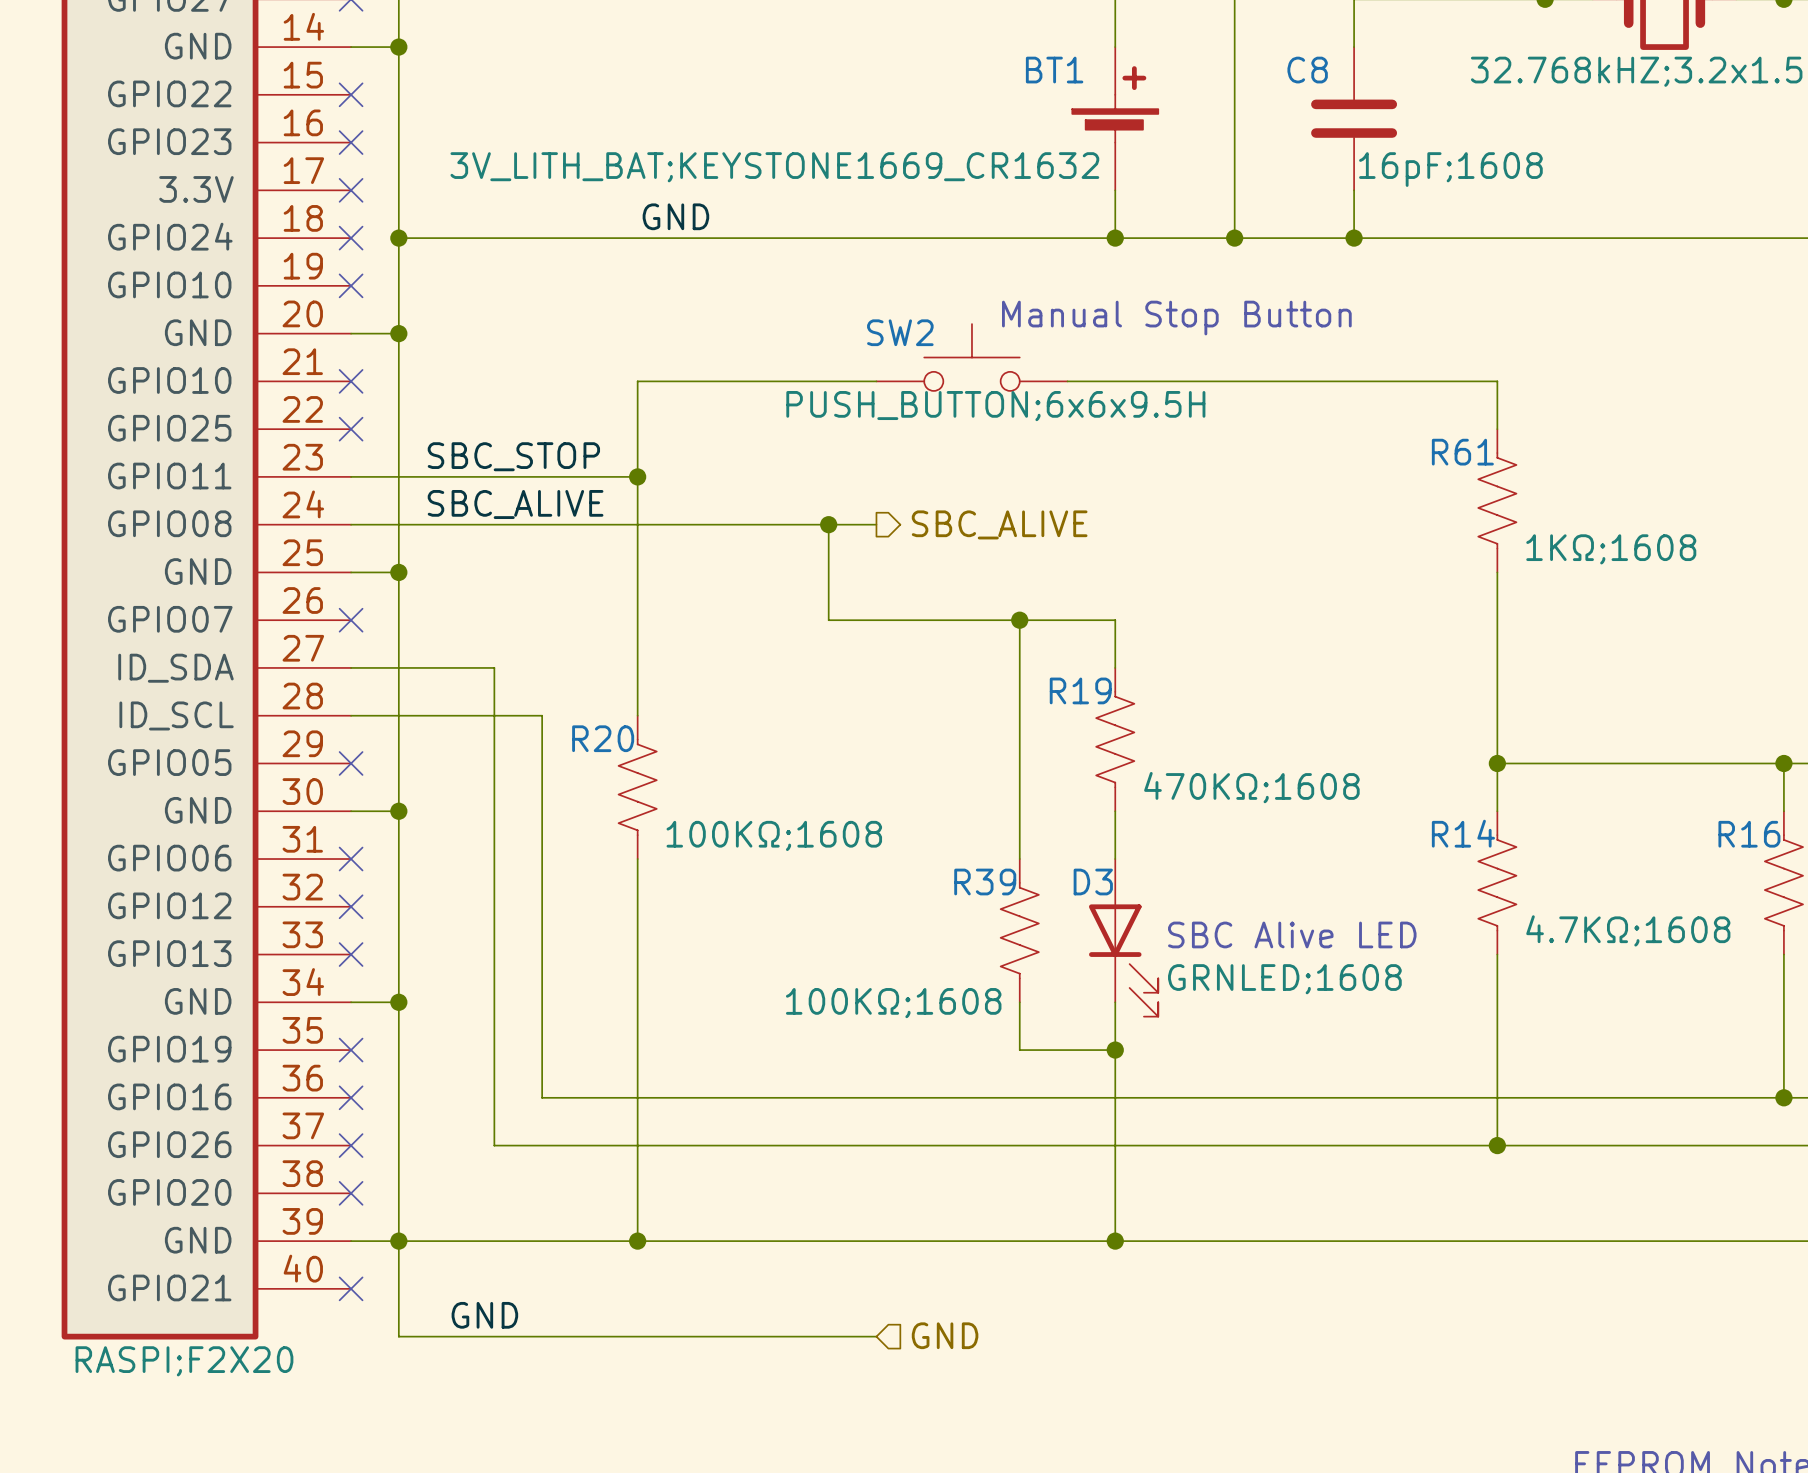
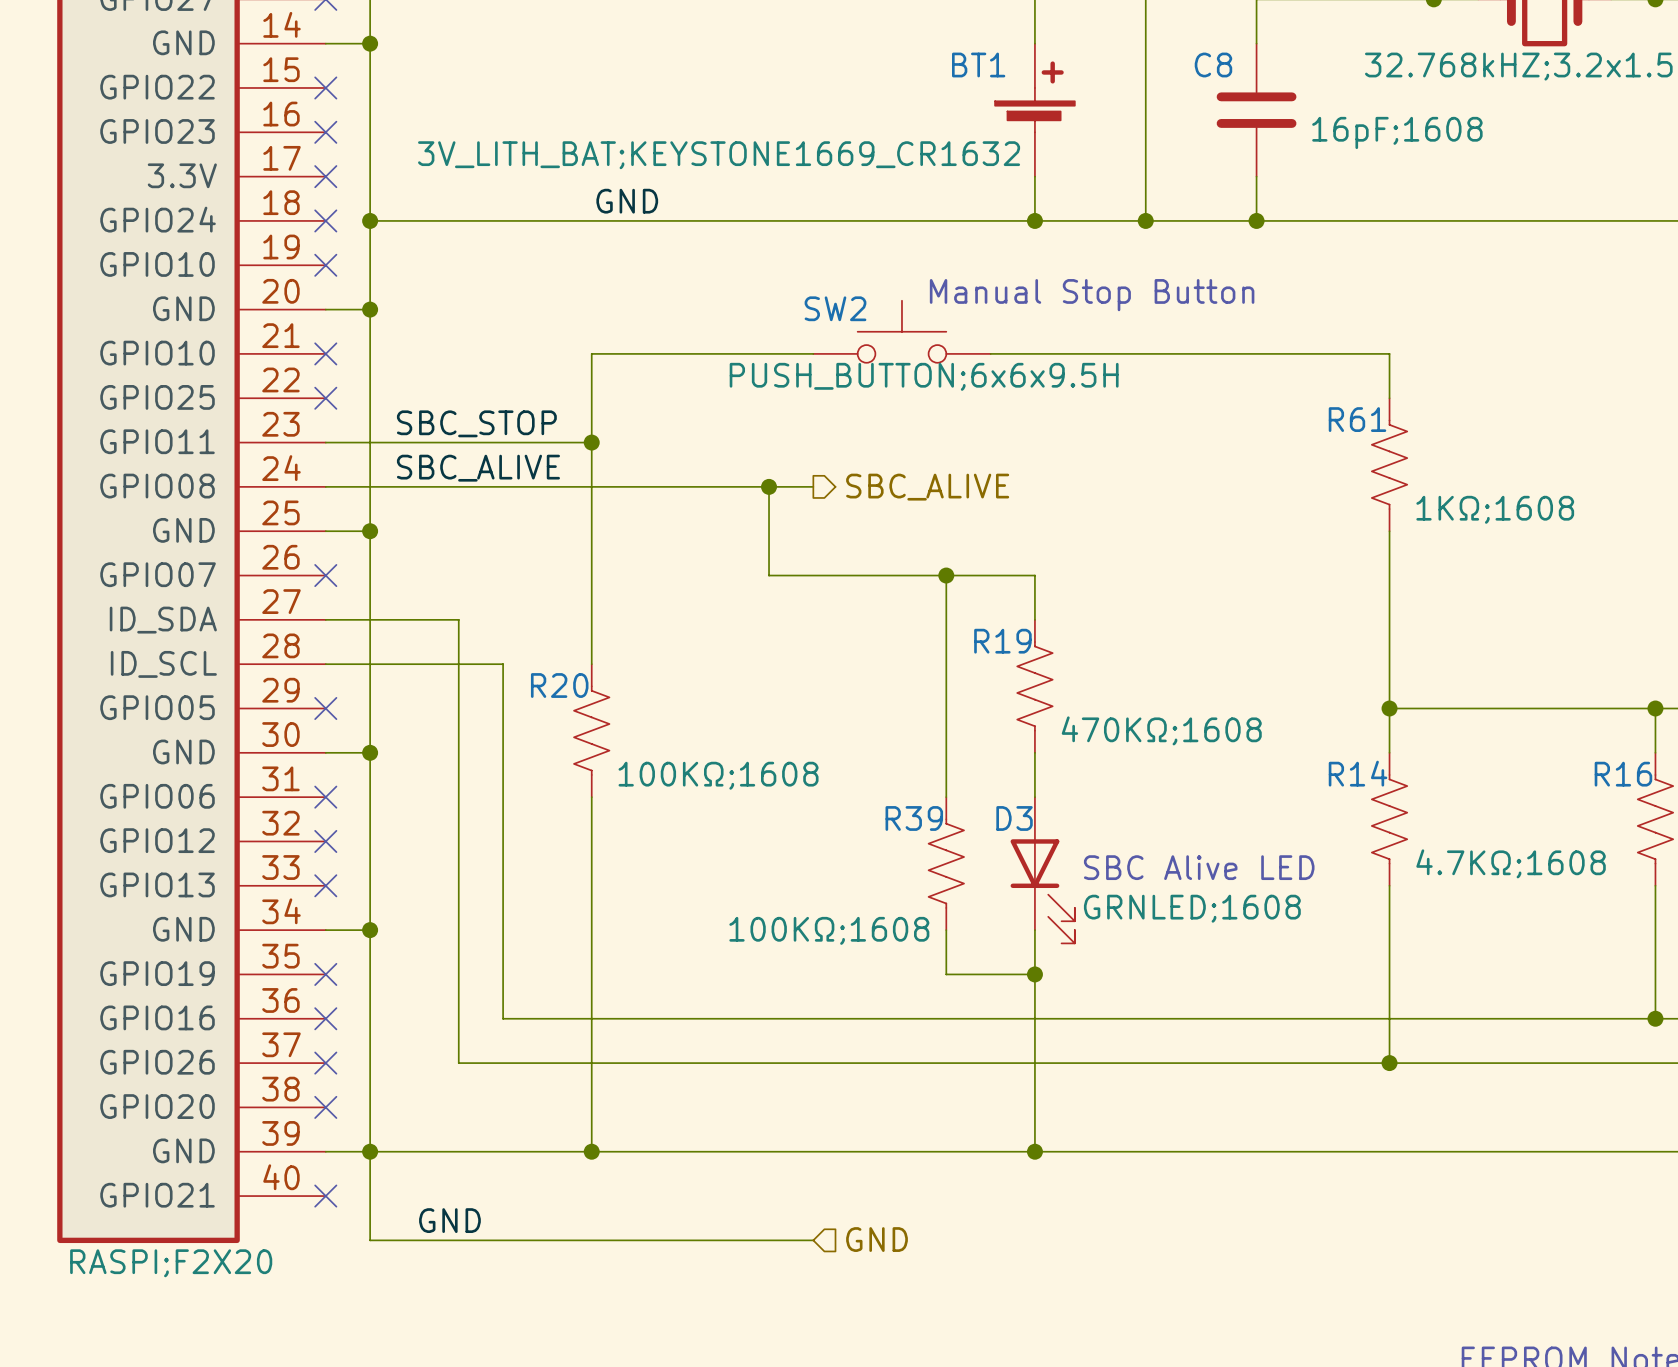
C8 value position: 16pF;1608 (1450, 169) -> 16pF;1608 (1397, 132)

